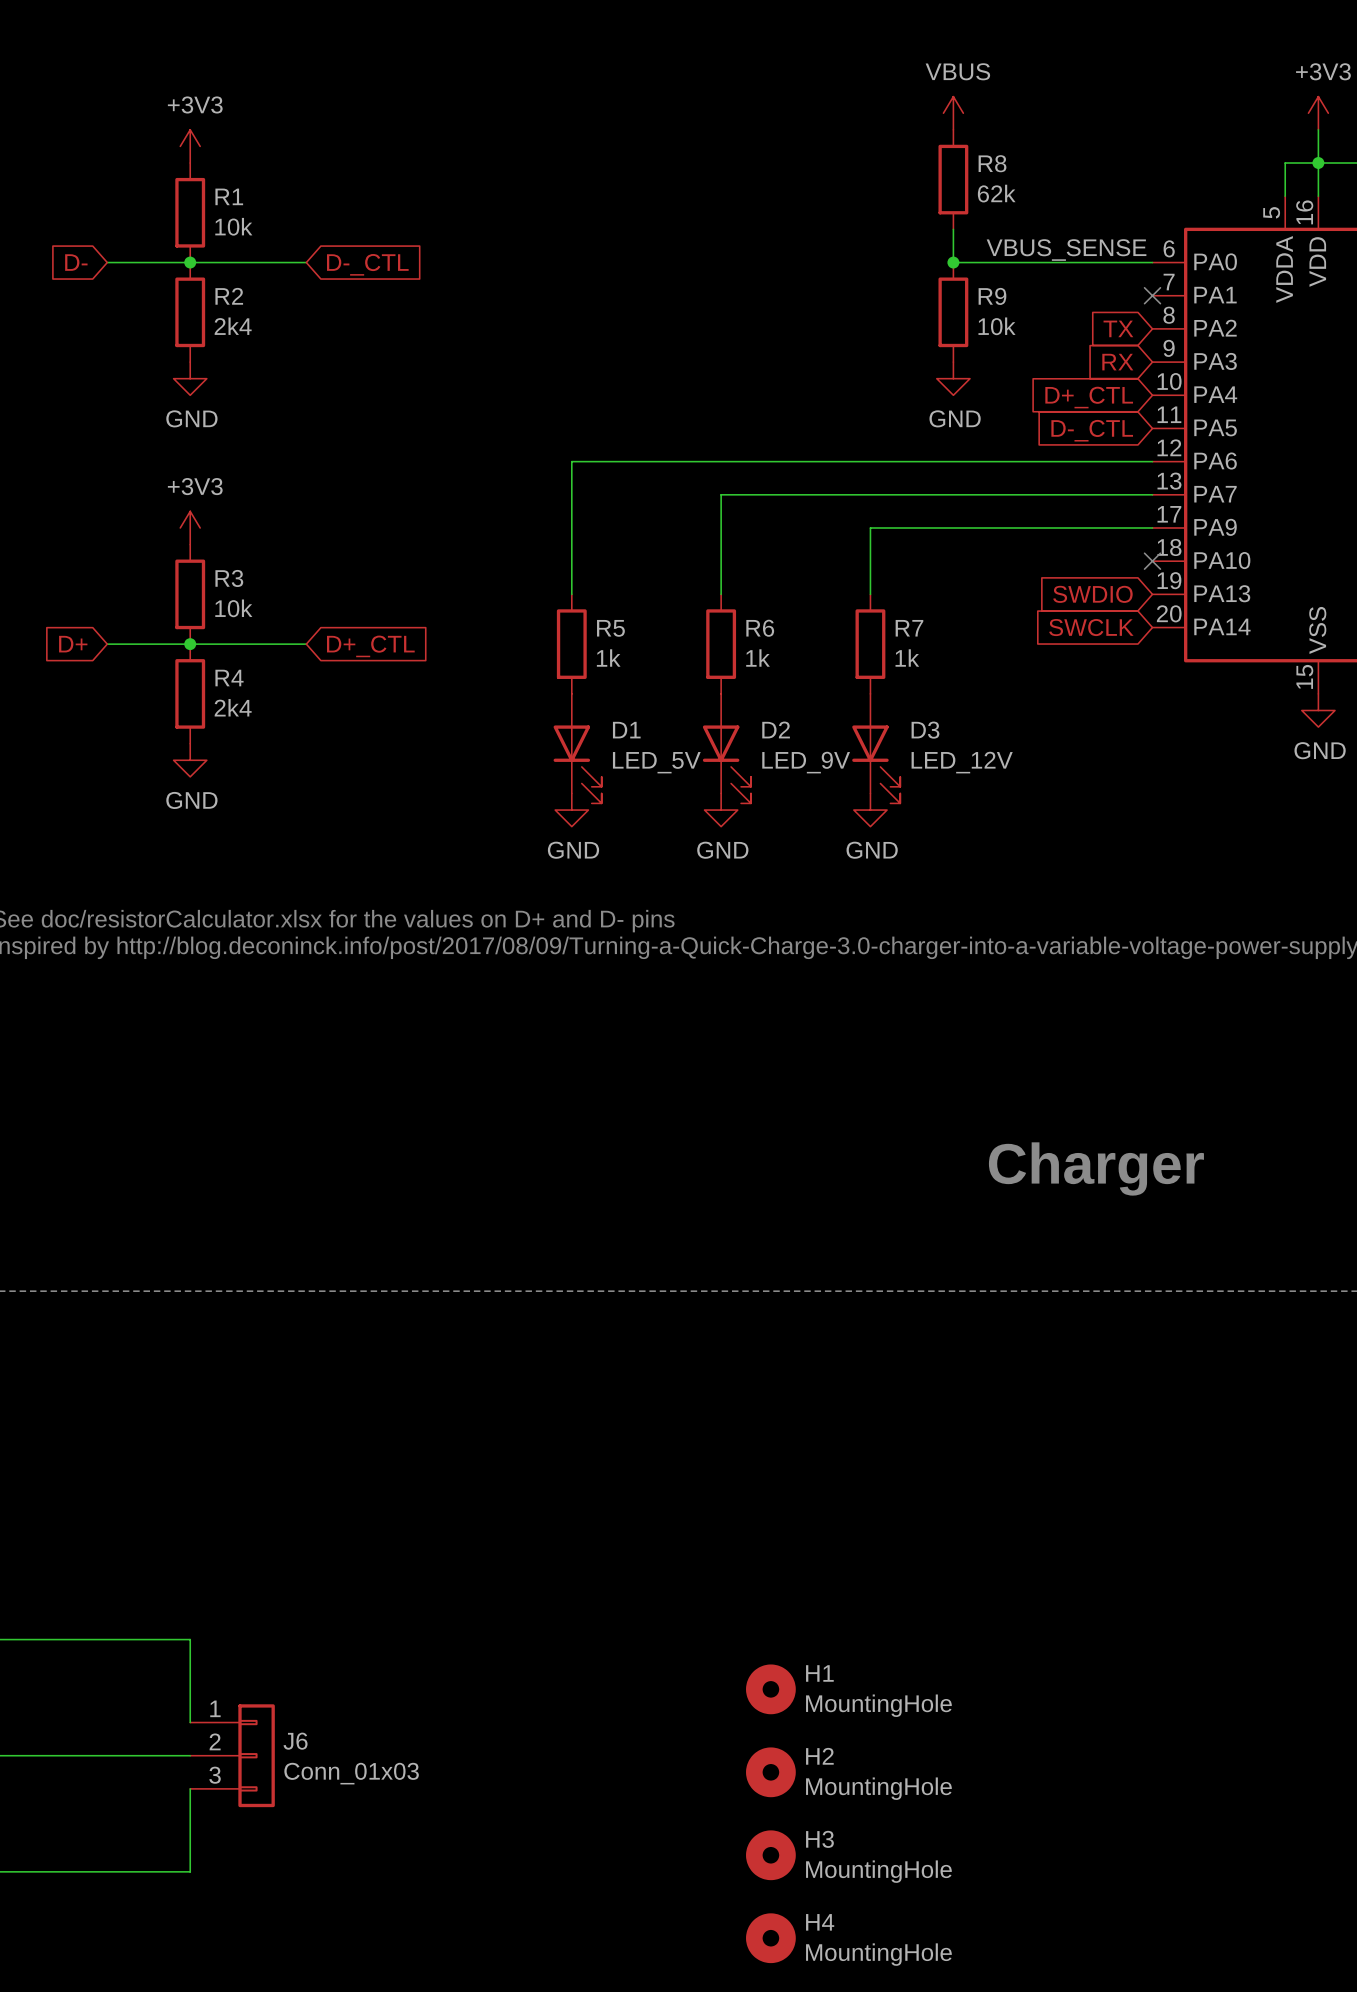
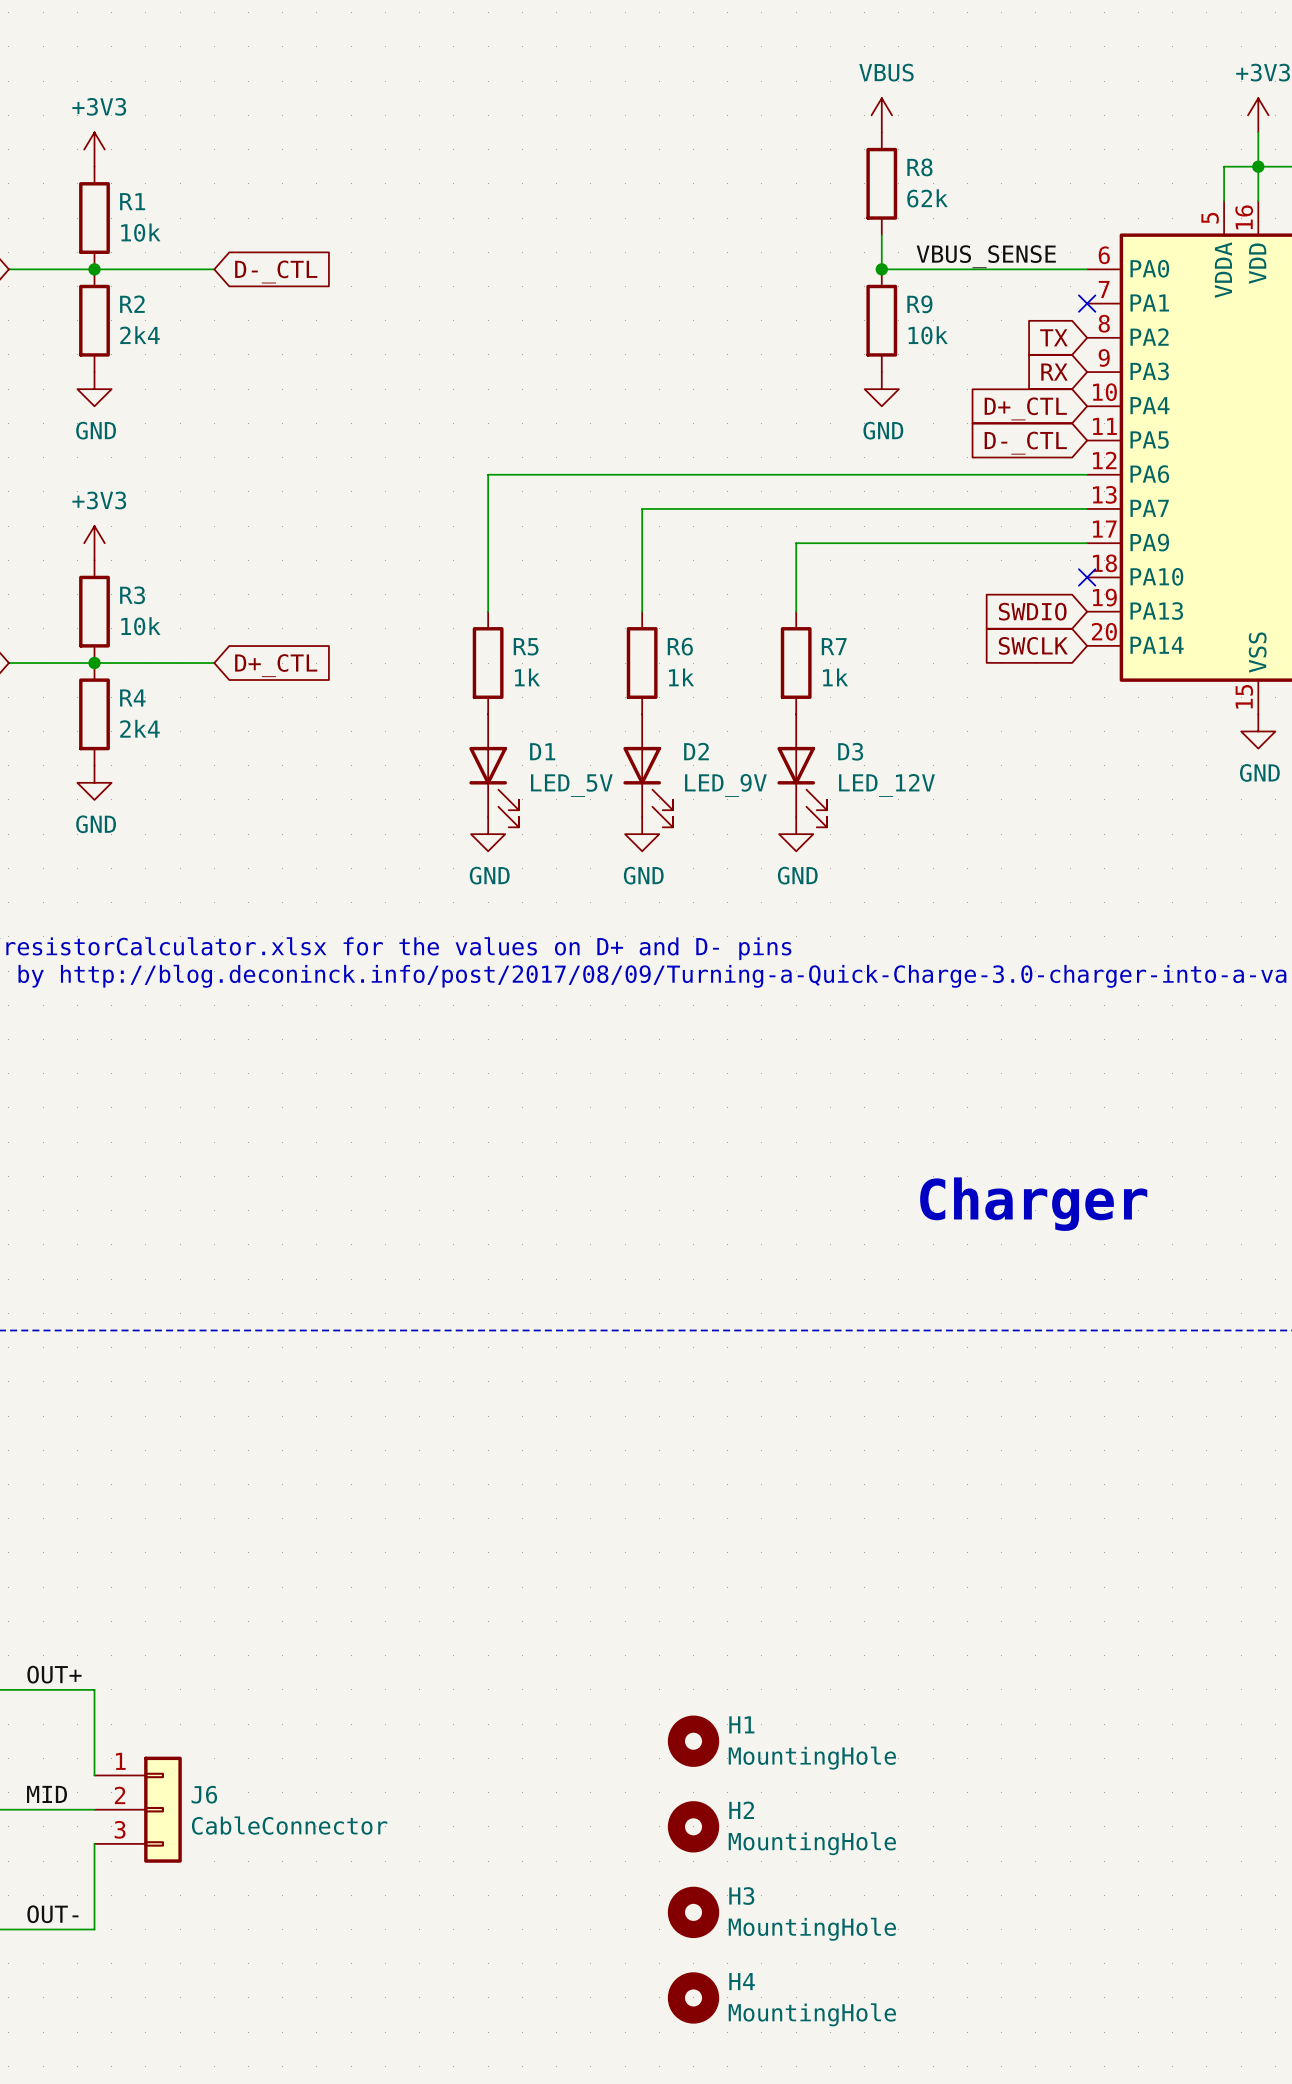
label: none -> OUT+ (54, 1674)
label: none -> MID (47, 1794)
J6 value: Conn_01x03 (351, 1773) -> CableConnector (289, 1825)
label: none -> OUT- (52, 1914)

